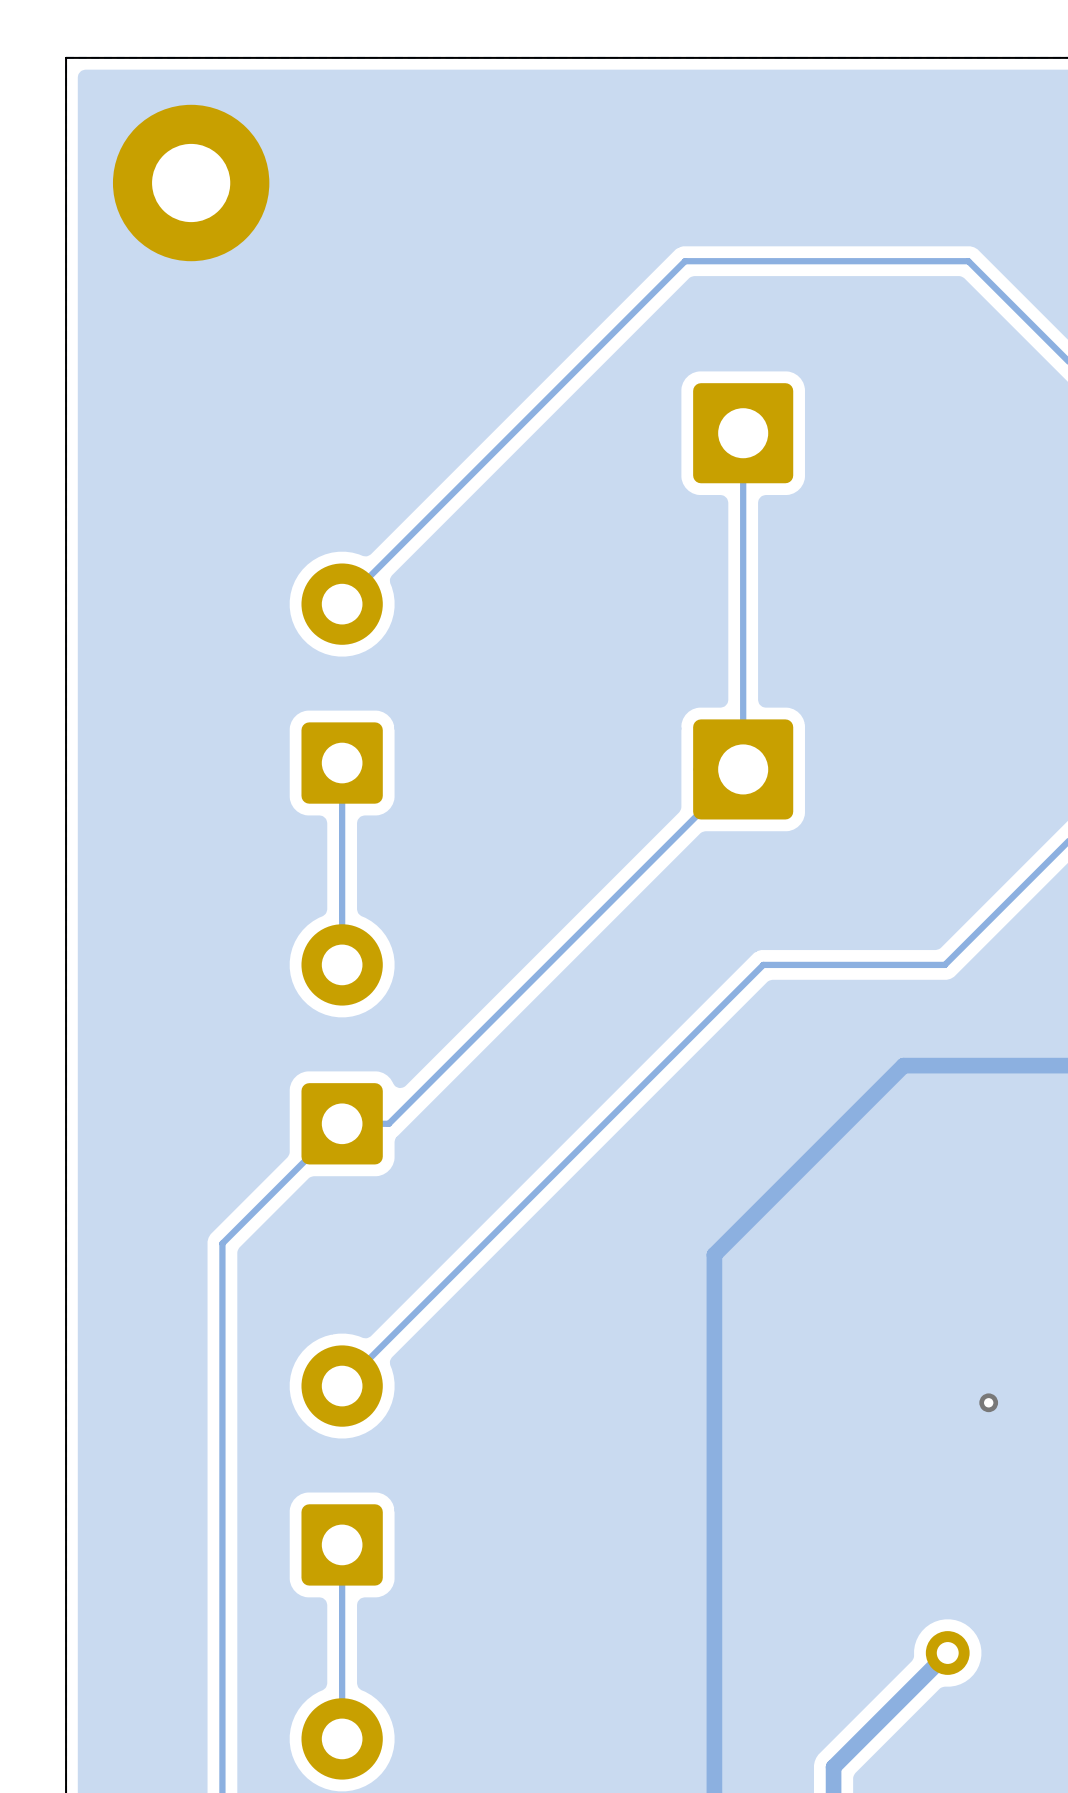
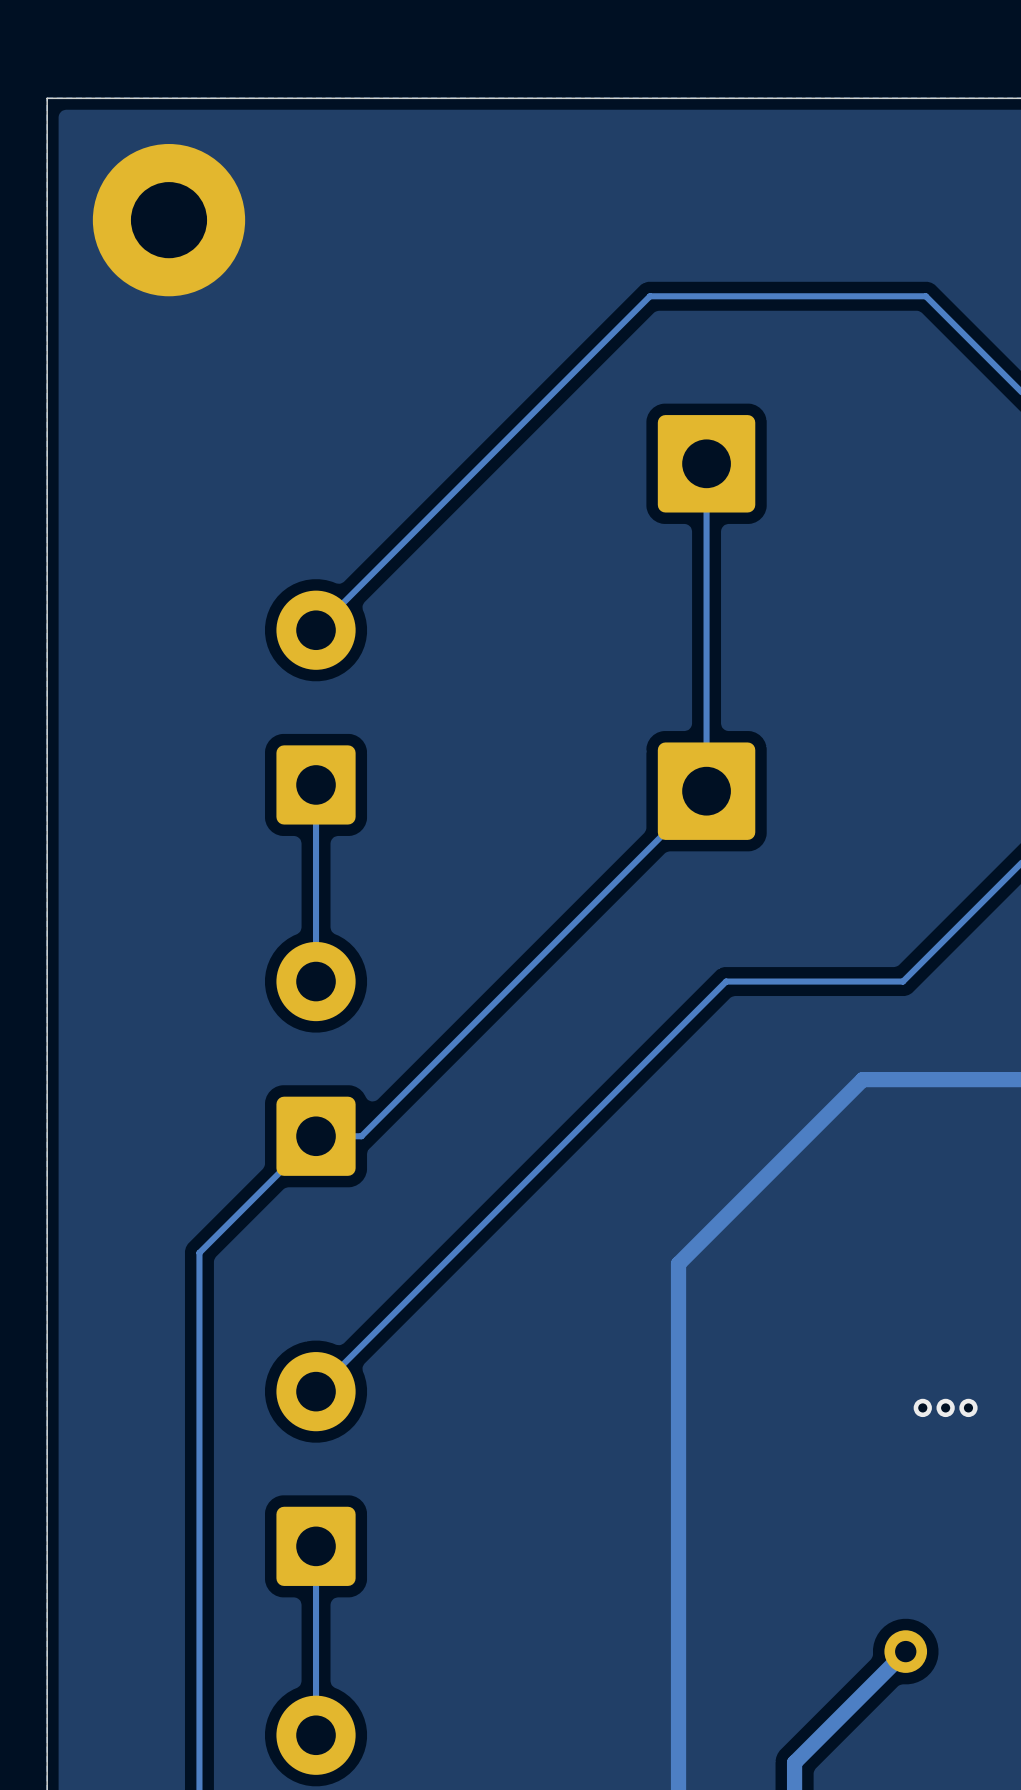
via: none -> (922, 1407)
via: none -> (968, 1407)

